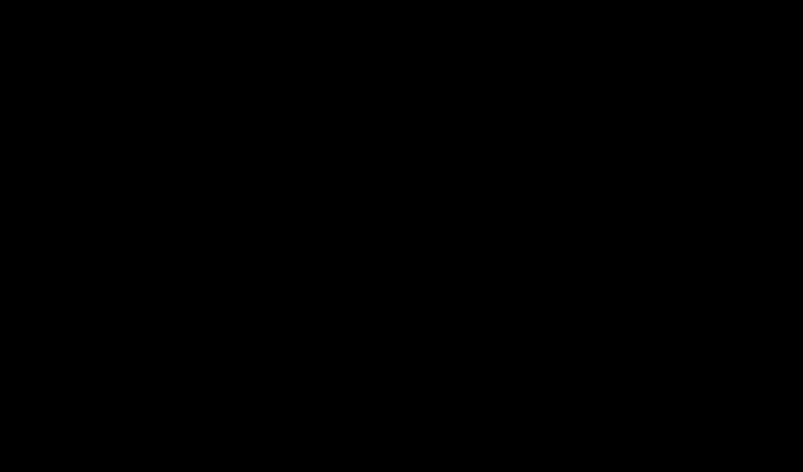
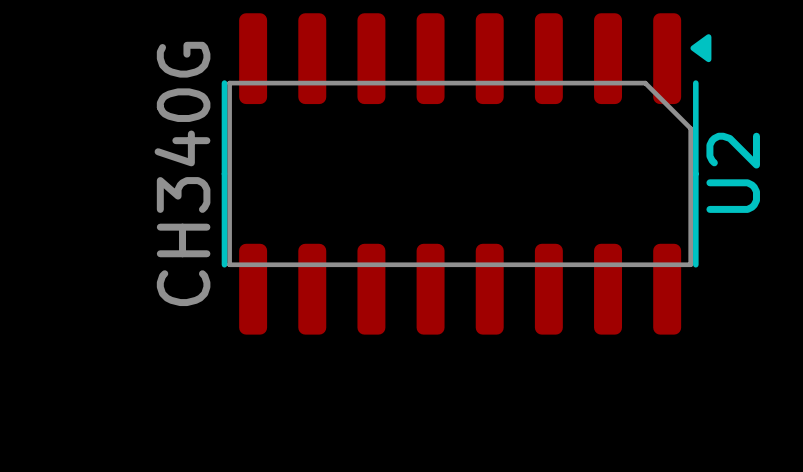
U2: none -> CH340G (466, 173)

